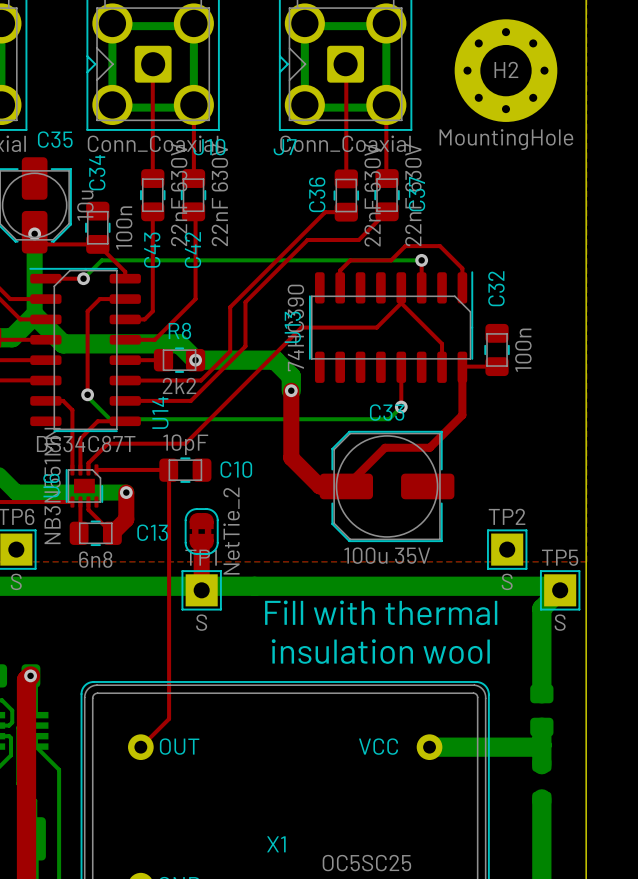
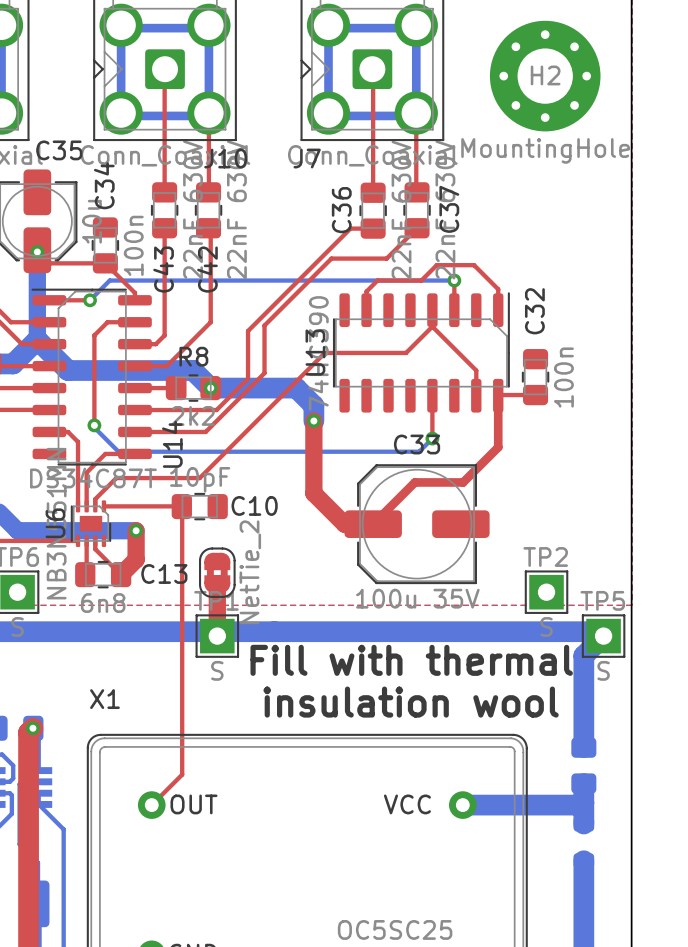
X1 name position: X1 (276, 844) -> X1 (104, 699)

